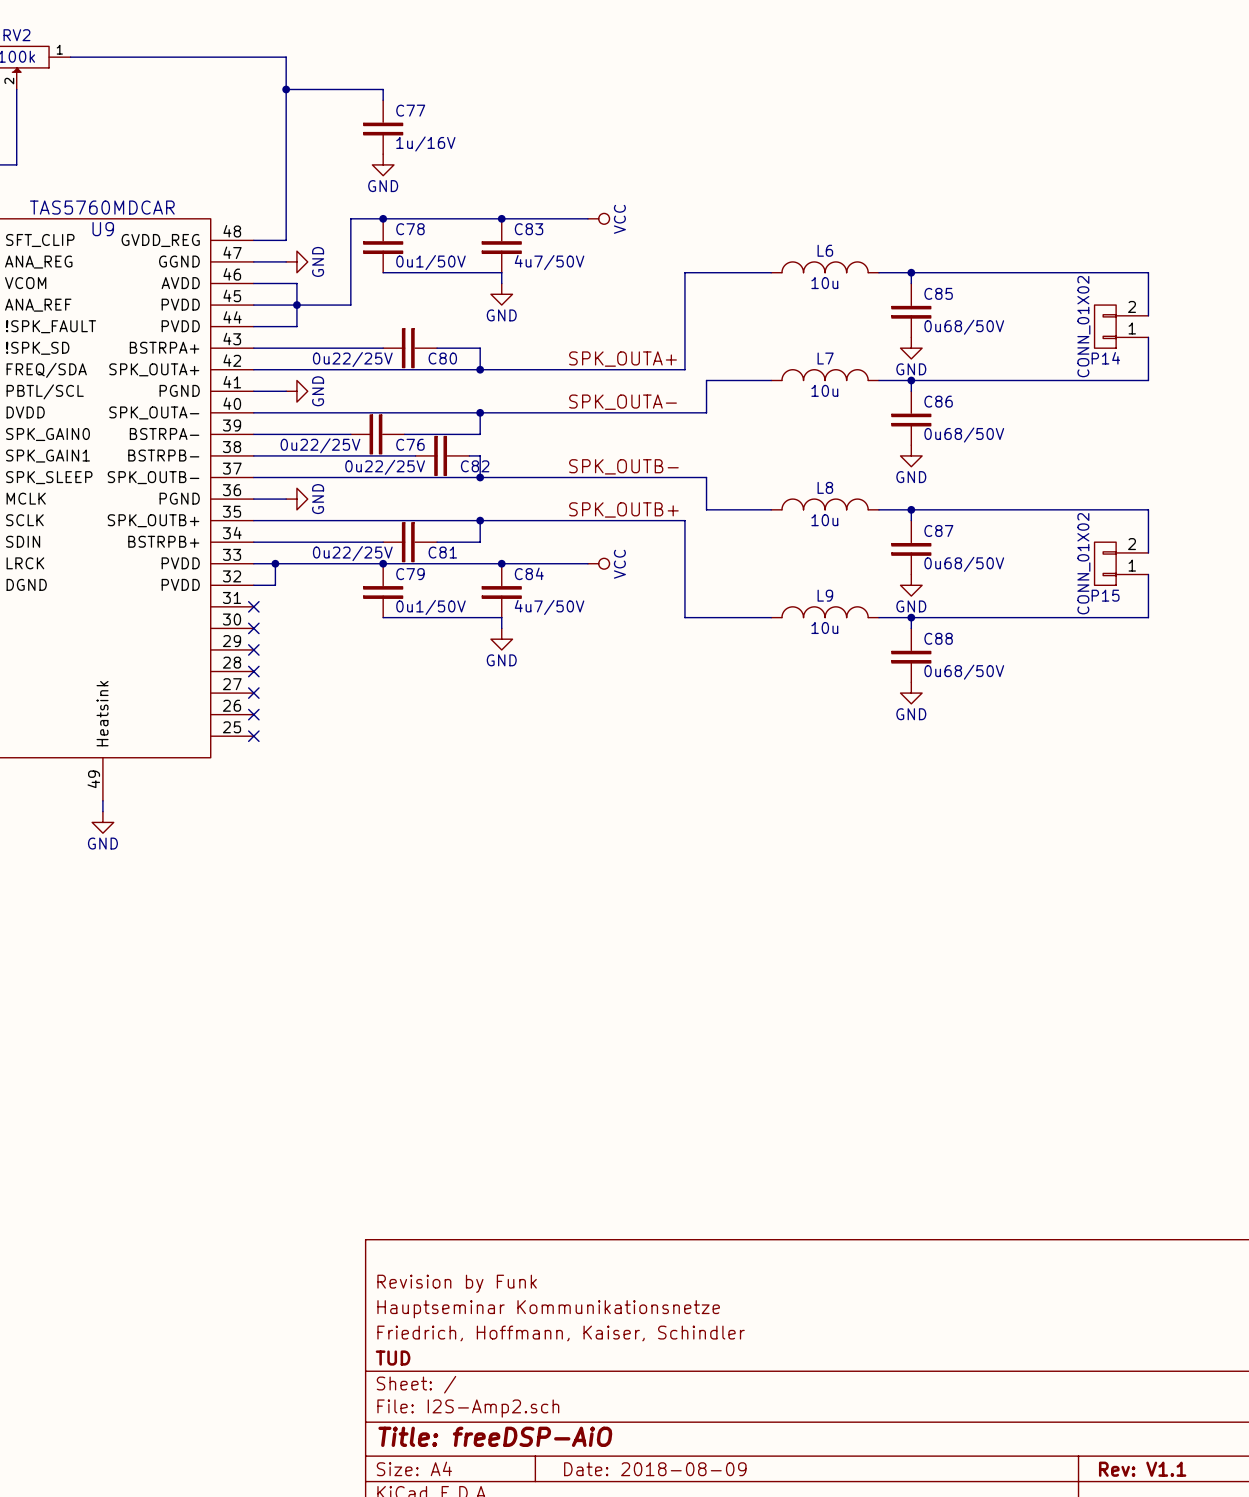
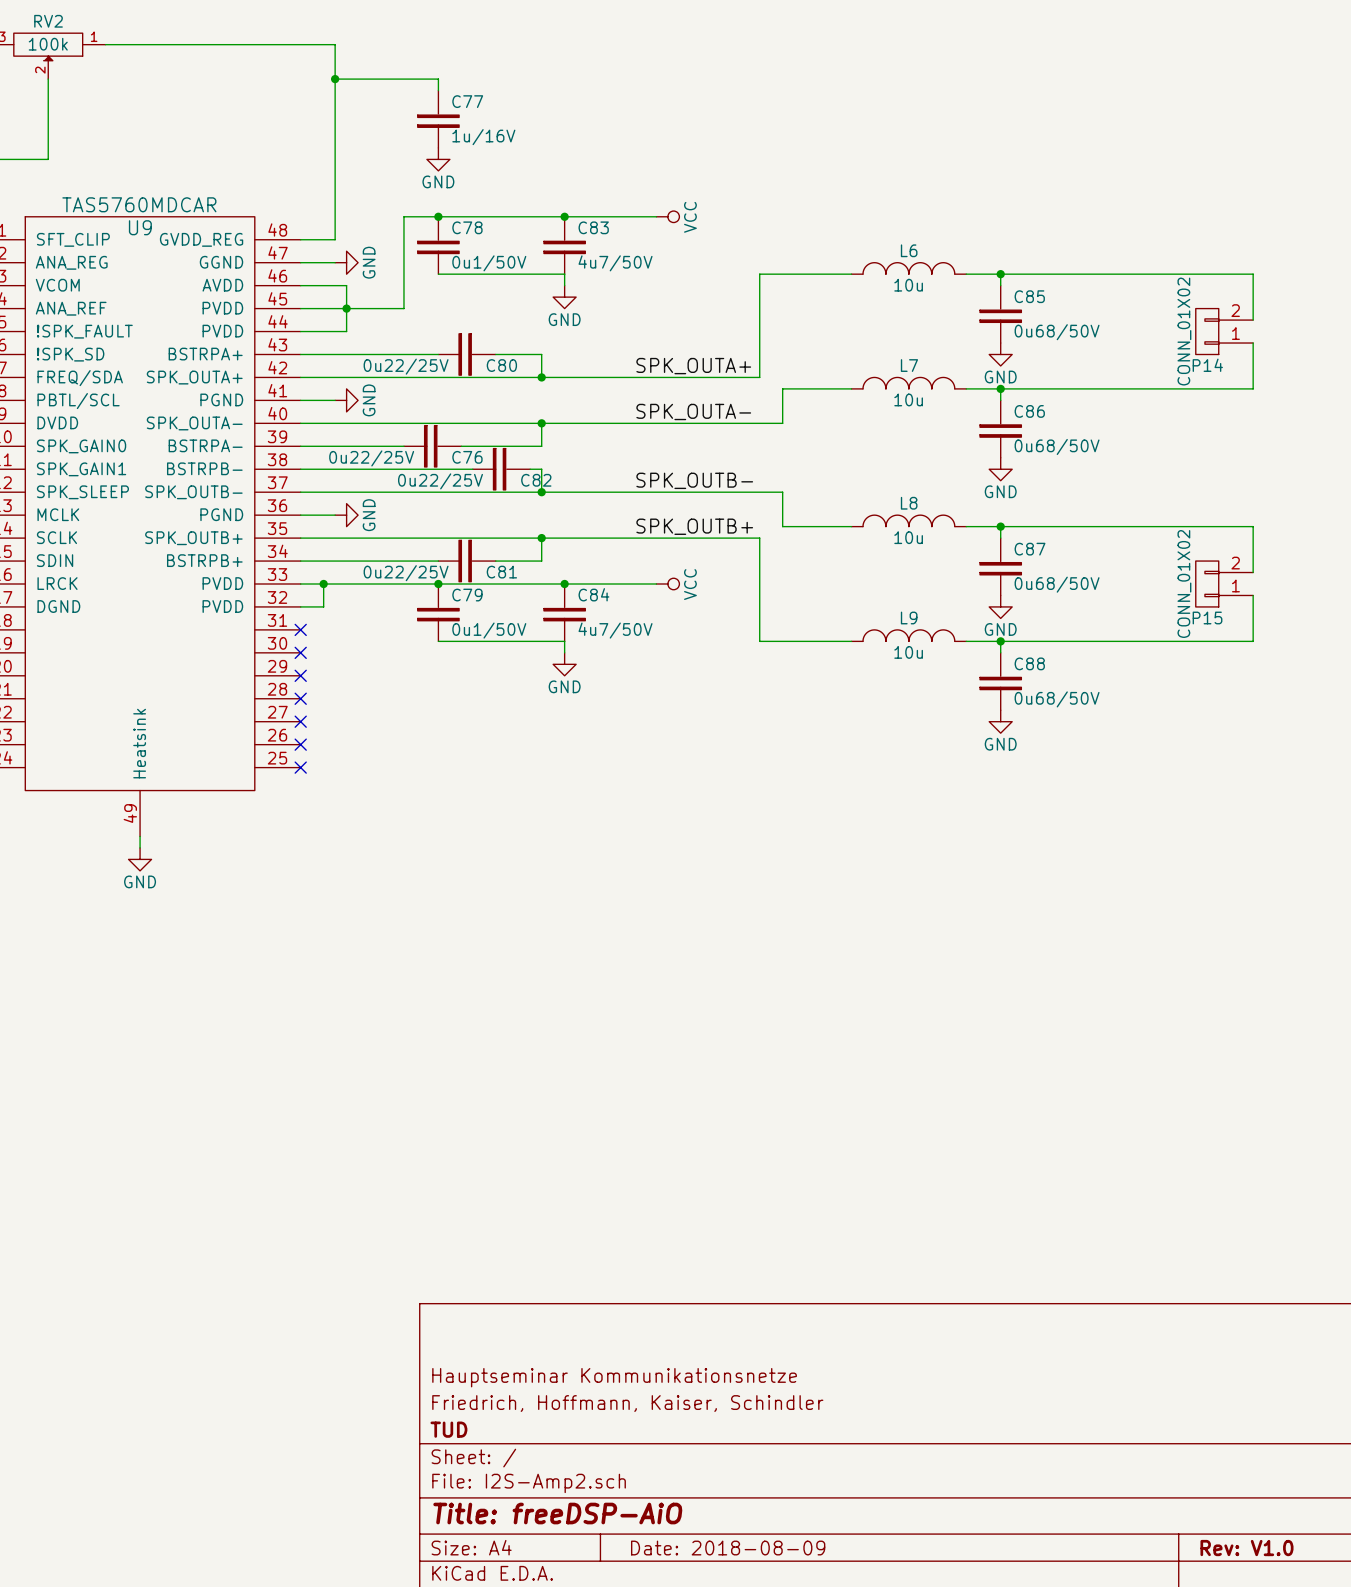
title block: Revision by Funk (457, 1283) -> none
title block: Rev: V1.1 (1142, 1469) -> Rev: V1.0 (1246, 1548)

